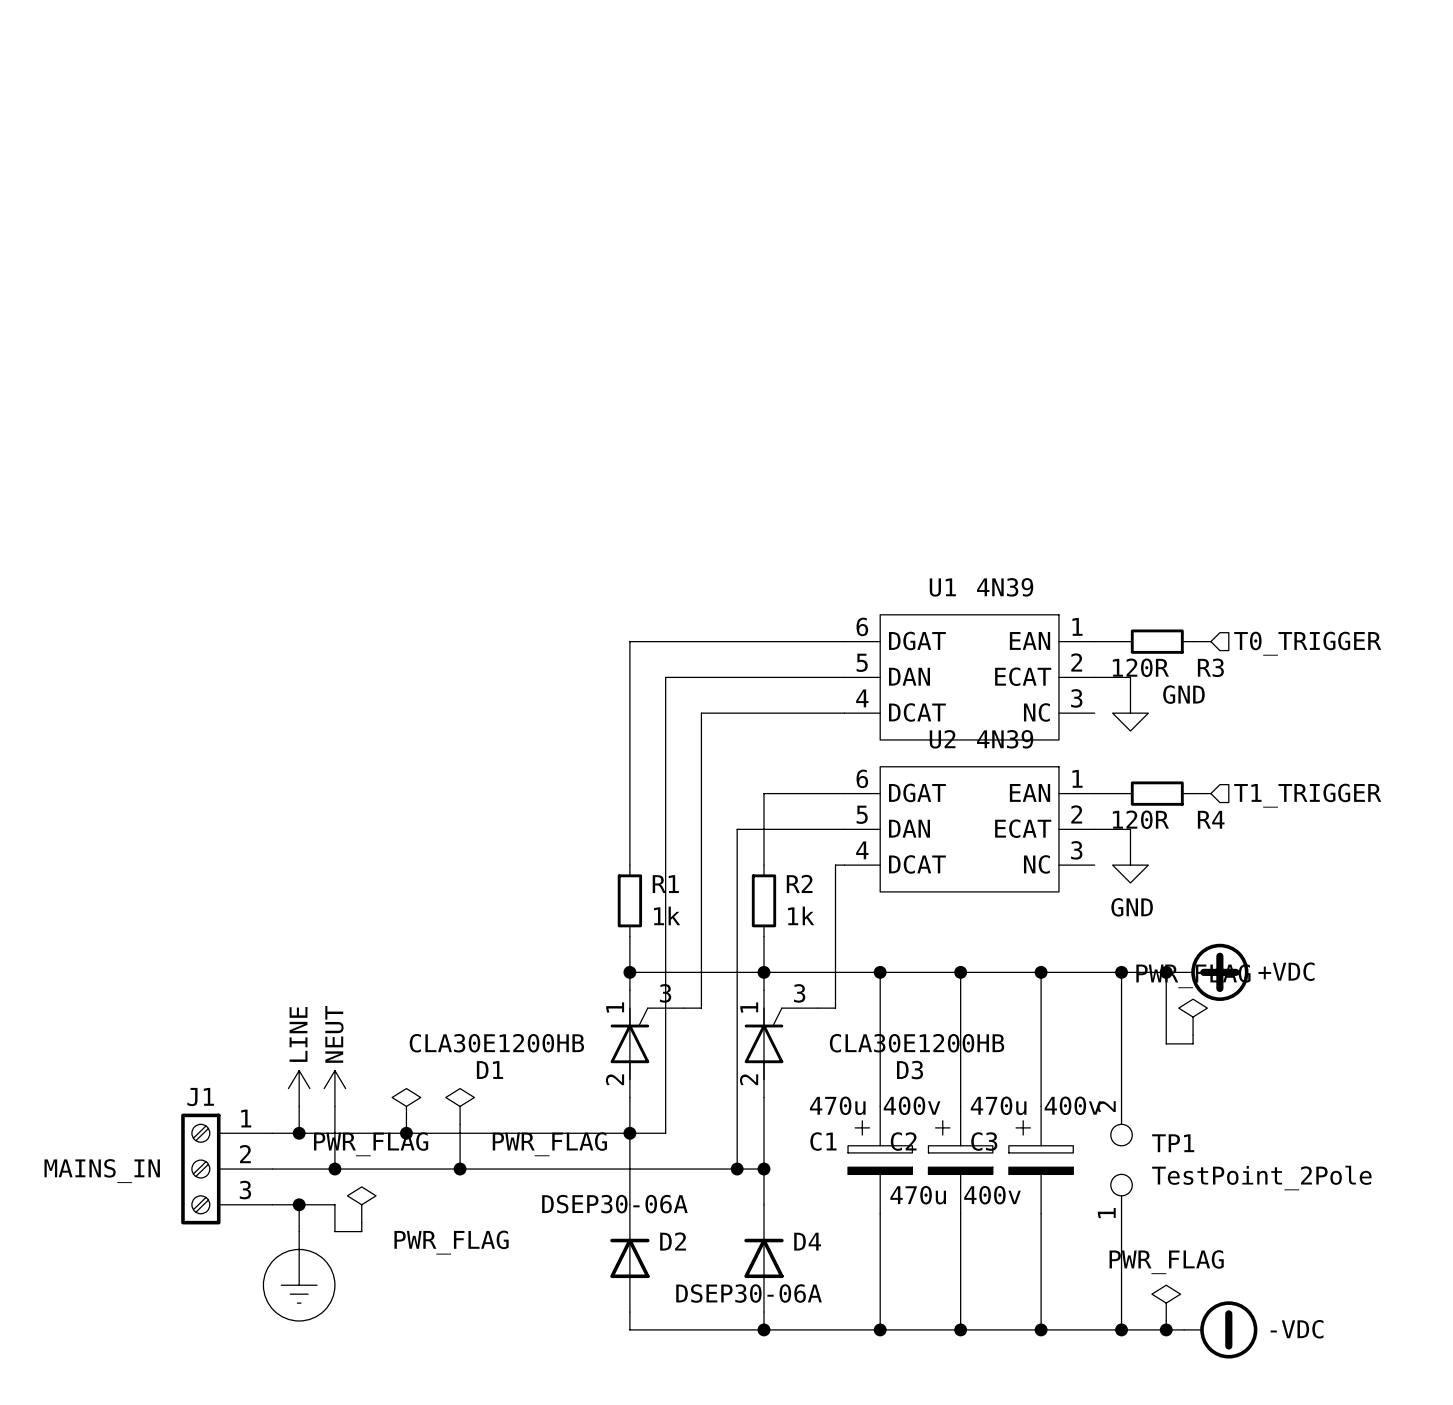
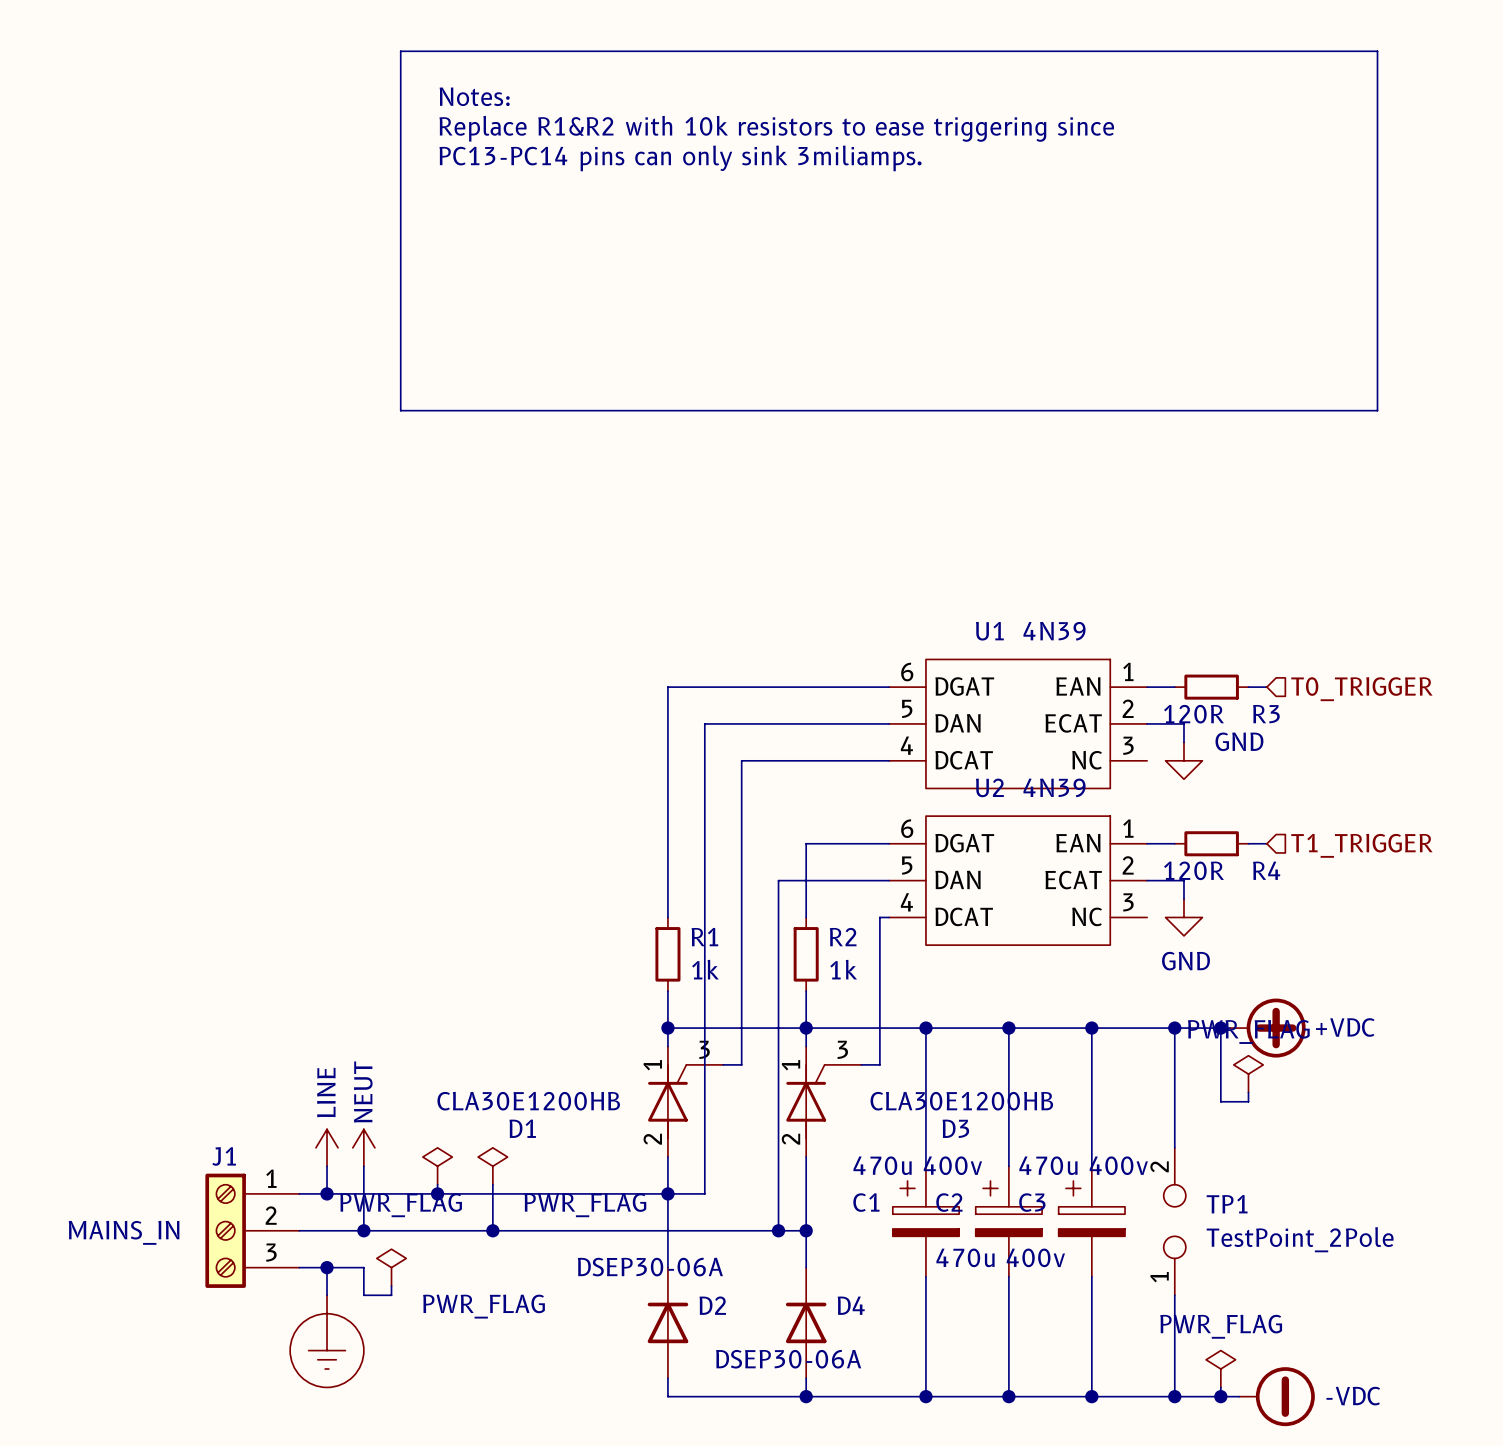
line: none -> (400, 51) (400, 410) (1377, 410) (1377, 51) (400, 51)
text: none -> Notes: (474, 96)
text: none -> Replace R1&R2 with 10k resistors to ease triggering since (776, 128)
text: none -> PC13-PC14 pins can only sink 3miliamps. (680, 158)

